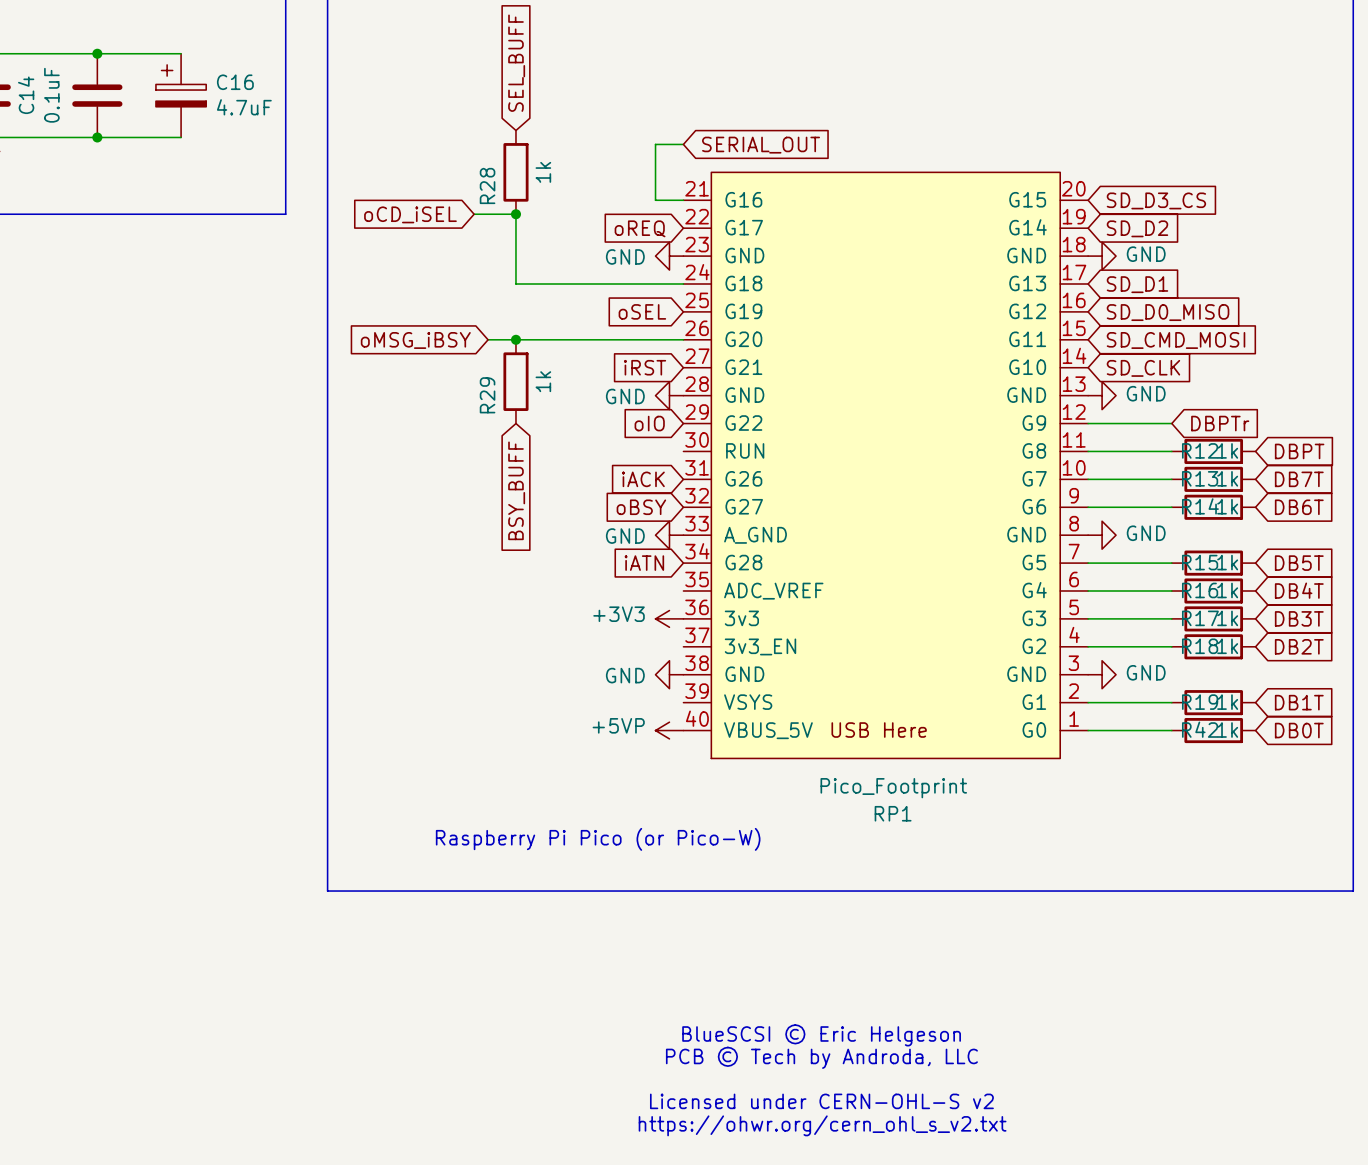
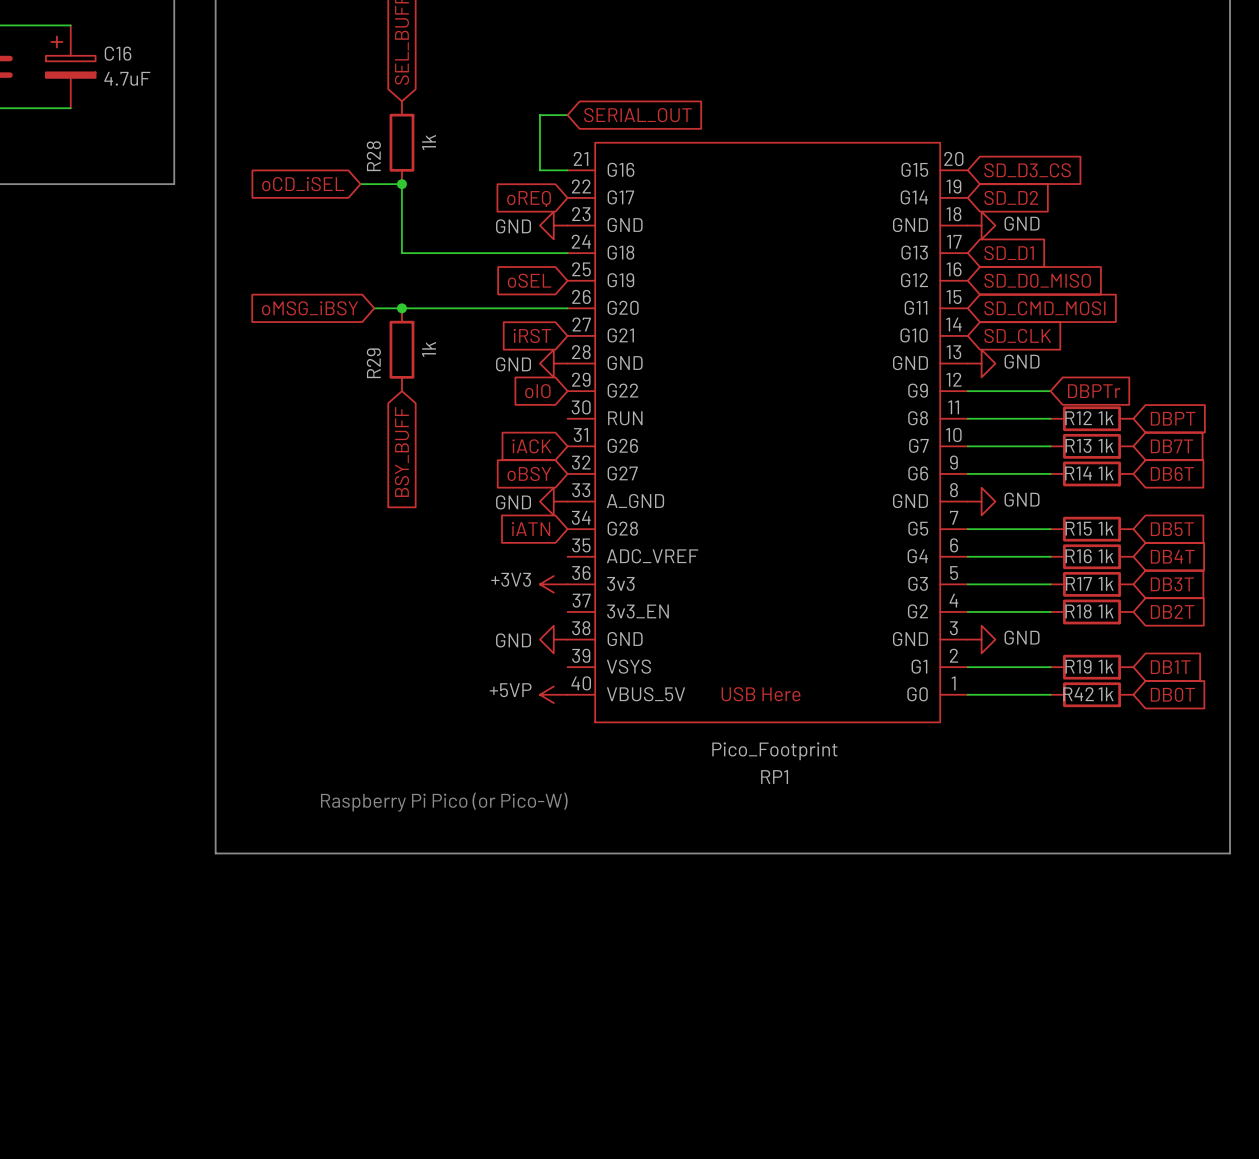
text: BlueSCSI © Eric Helgeson (821, 1035) -> none
text: PCB © Tech by Androda, LLC (821, 1057) -> none
text: Licensed under CERN-OHL-S v2 (821, 1101) -> none
text: https://ohwr.org/cern_ohl_s_v2.txt (822, 1125) -> none

